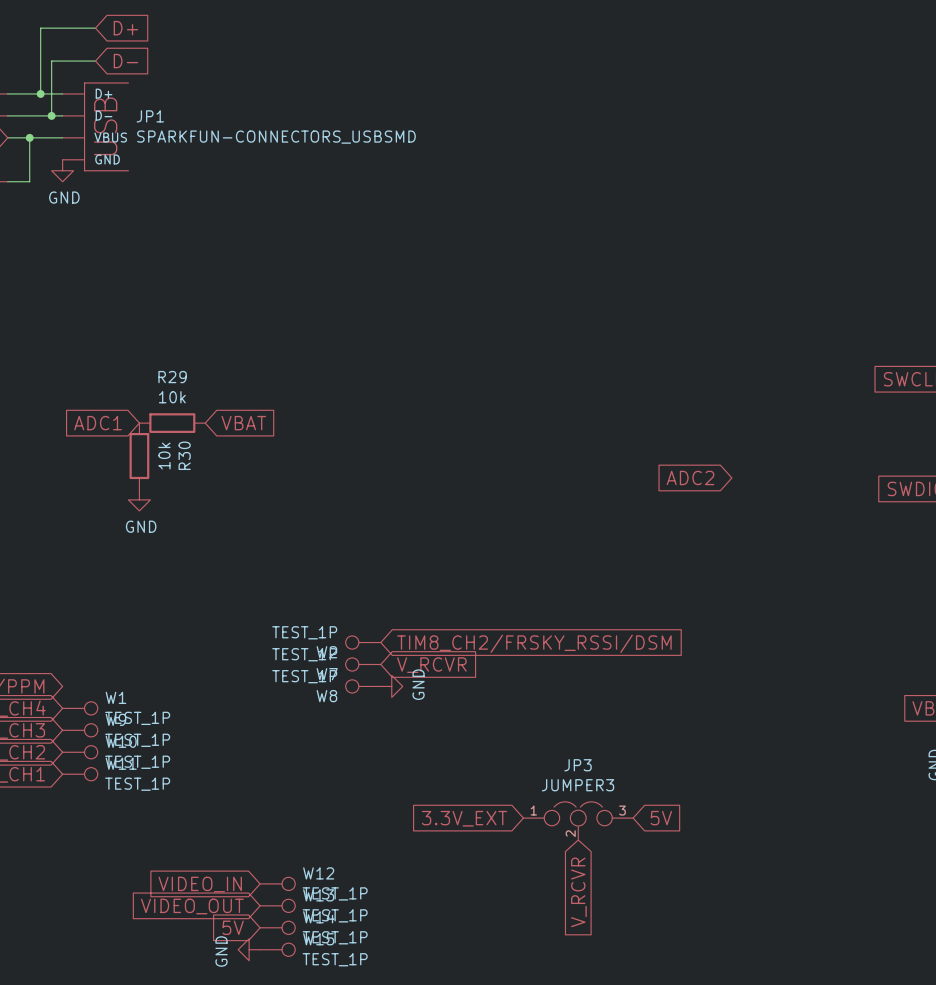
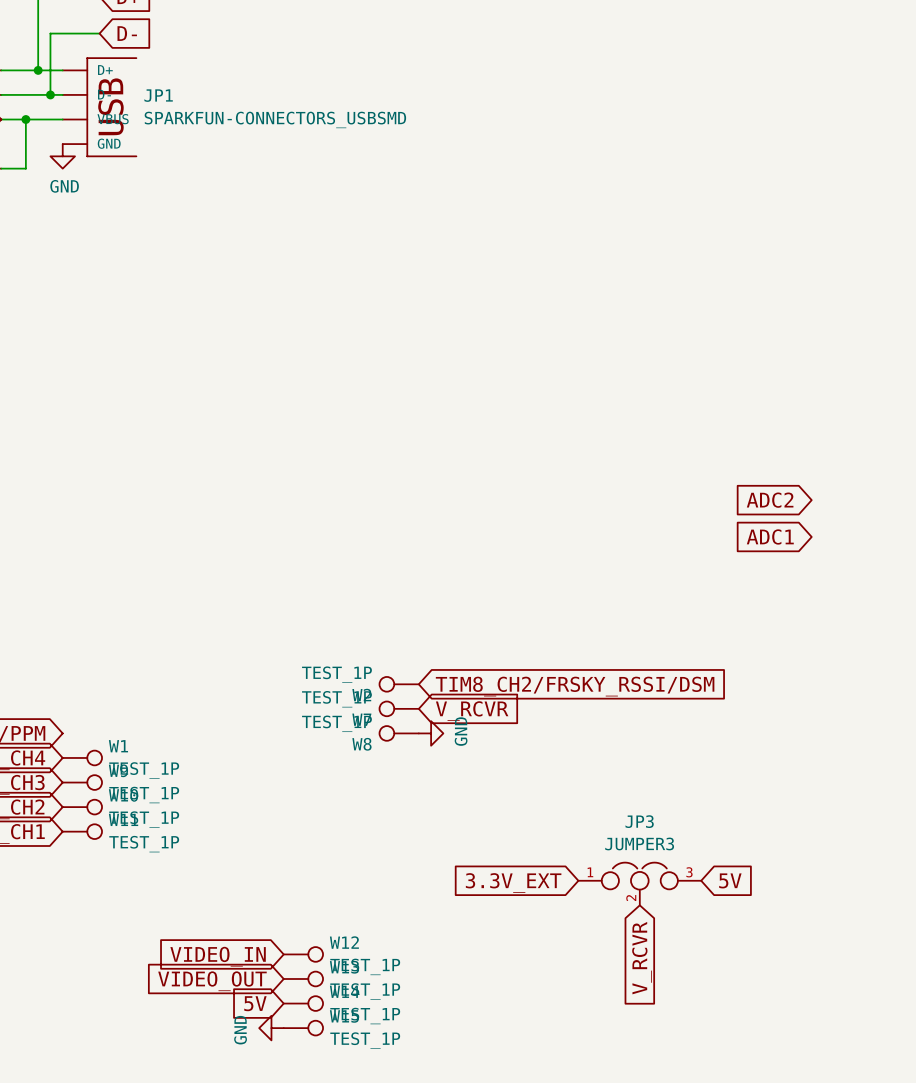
global label: ADC1 (98, 423) -> none
R29: 10k (172, 423) -> none
global label: VBAT (243, 423) -> none
R30: 10k (139, 456) -> none
power symbol: GND (139, 499) -> none
global label: none -> ADC1 (770, 536)

